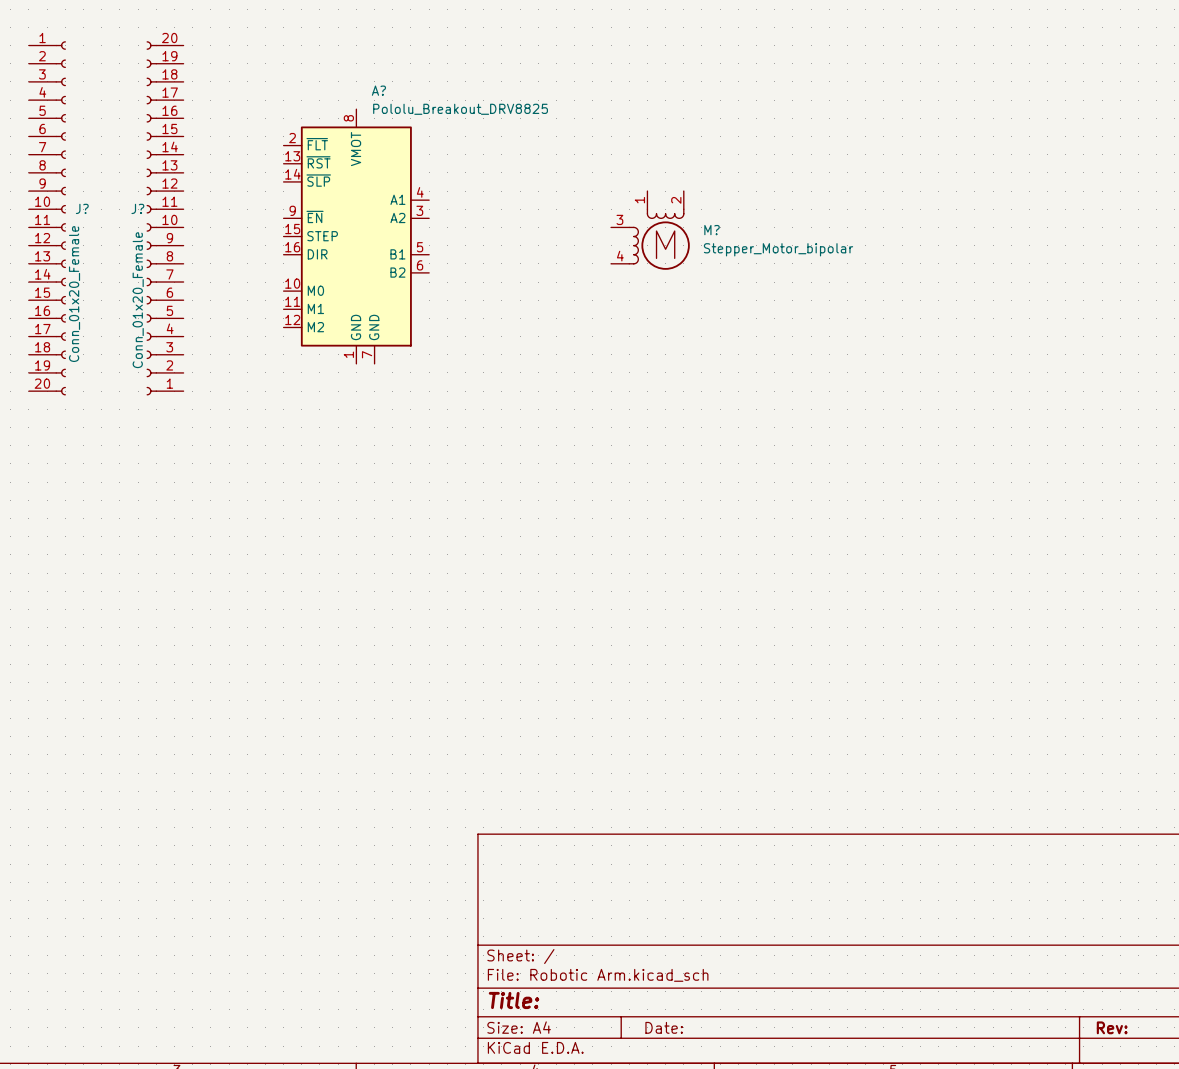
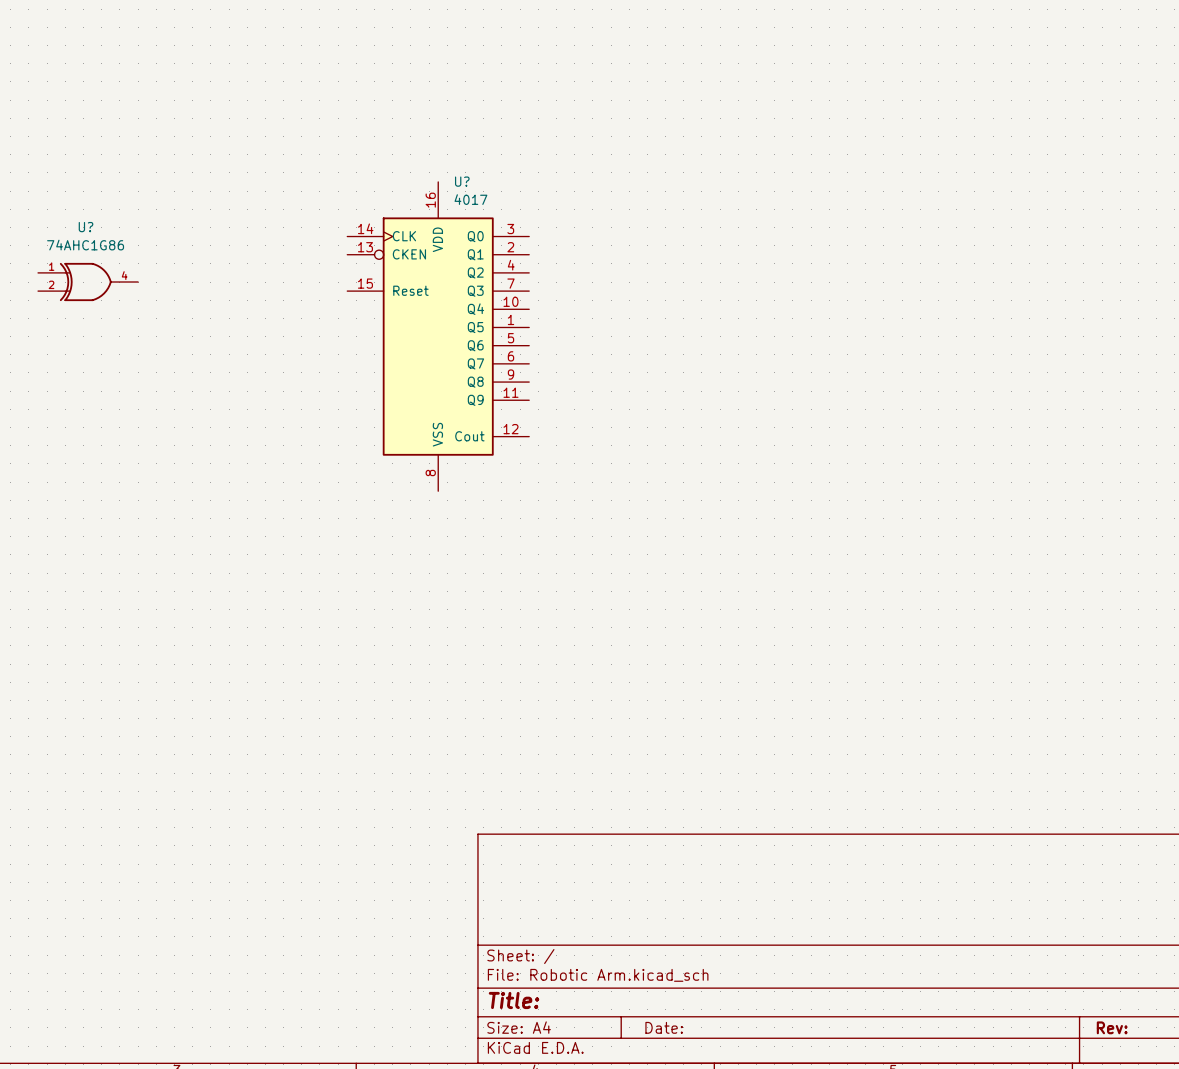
J?: Conn_01x20_Female (47, 218) -> none
J?: Conn_01x20_Female (165, 218) -> none
M?: Stepper_Motor_bipolar (650, 230) -> none
A?: Pololu_Breakout_DRV8825 (356, 236) -> none
U?: none -> 74AHC1G86 (88, 282)
U?: none -> 4017 (438, 336)

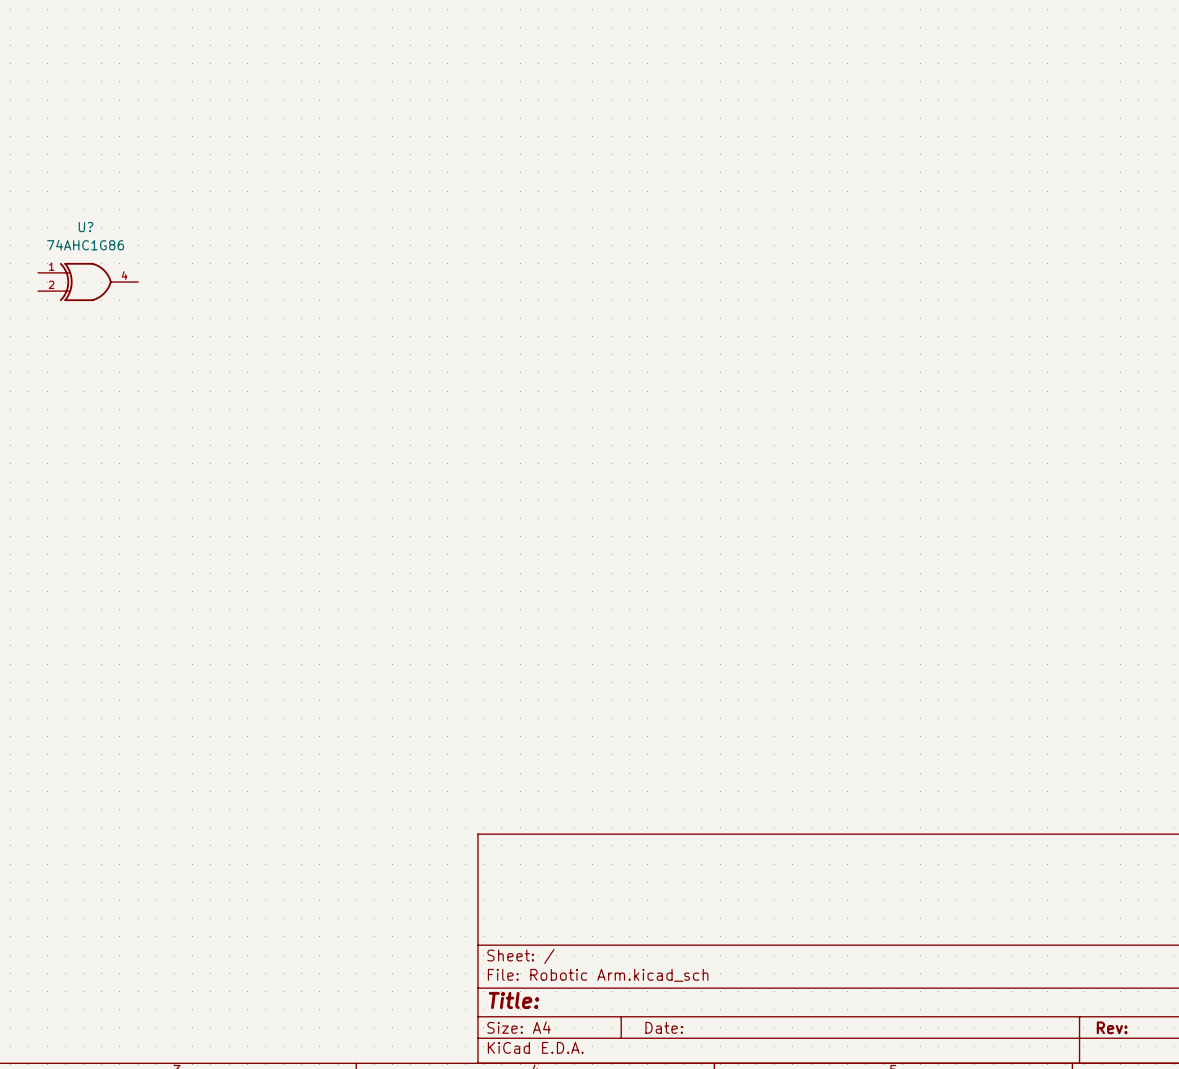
U?: 4017 (438, 336) -> none

